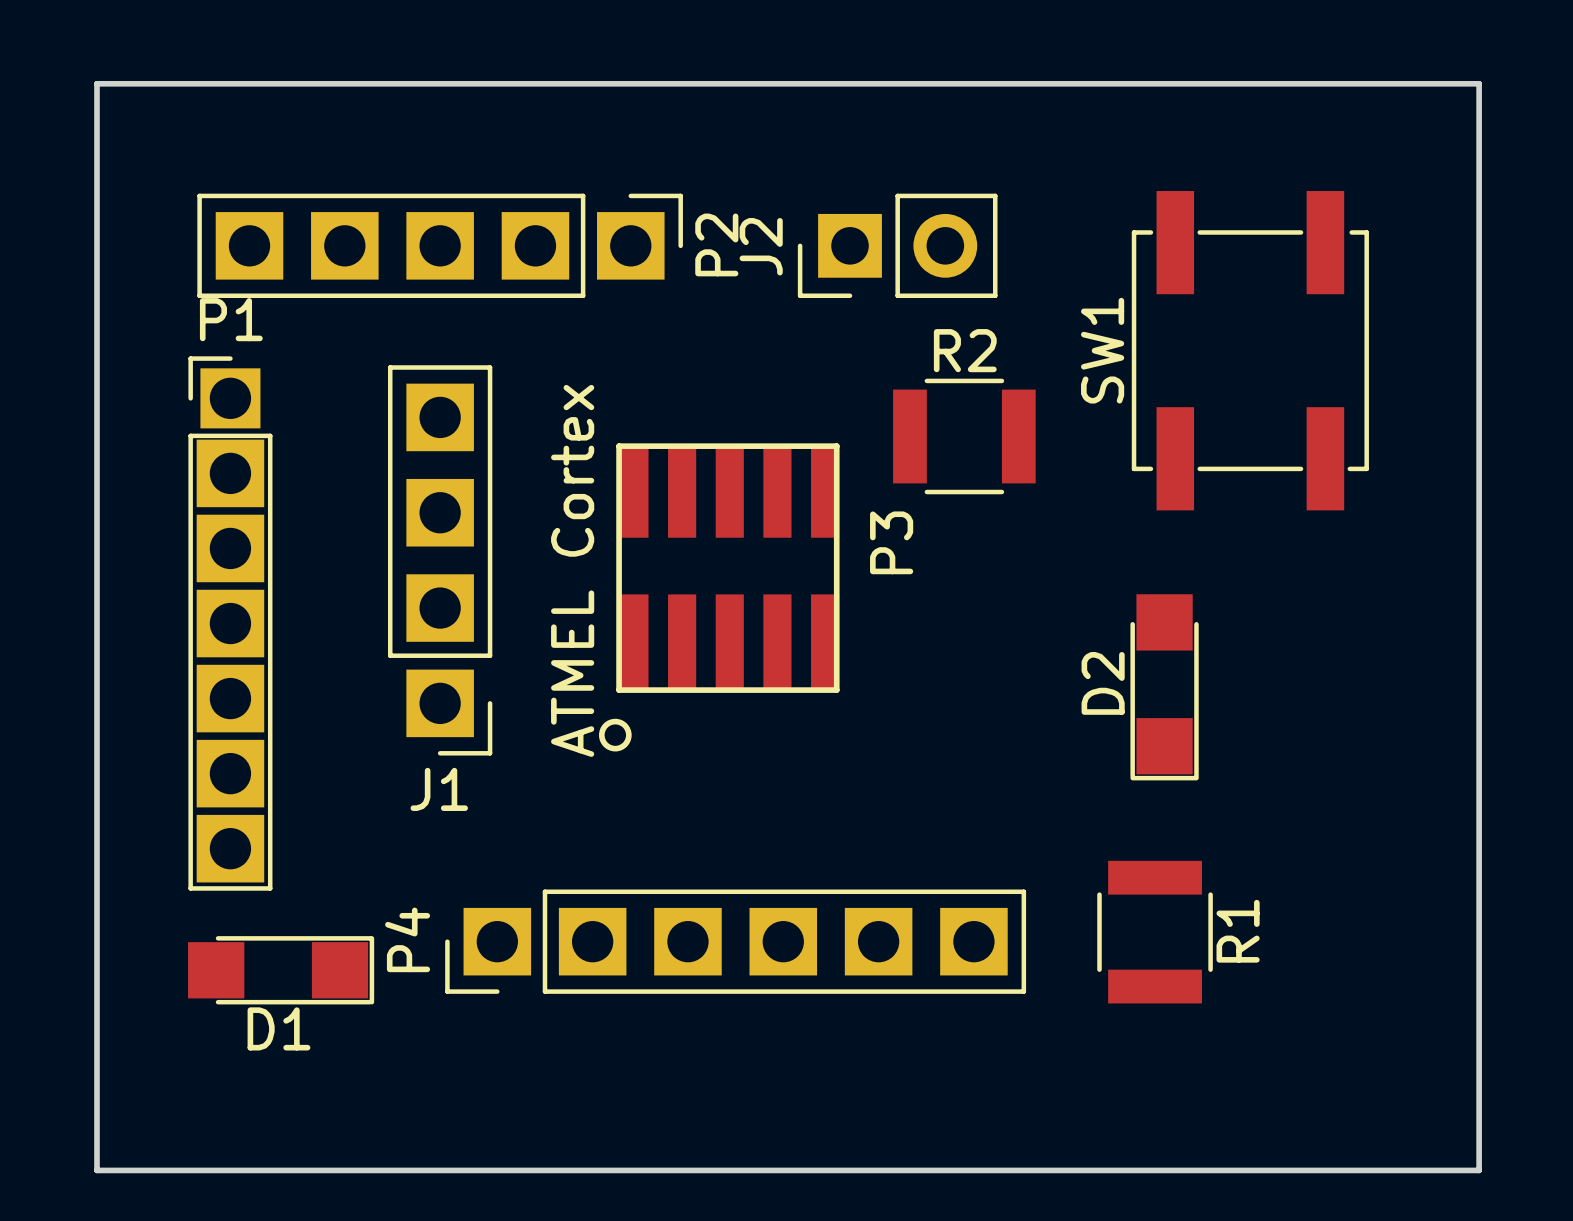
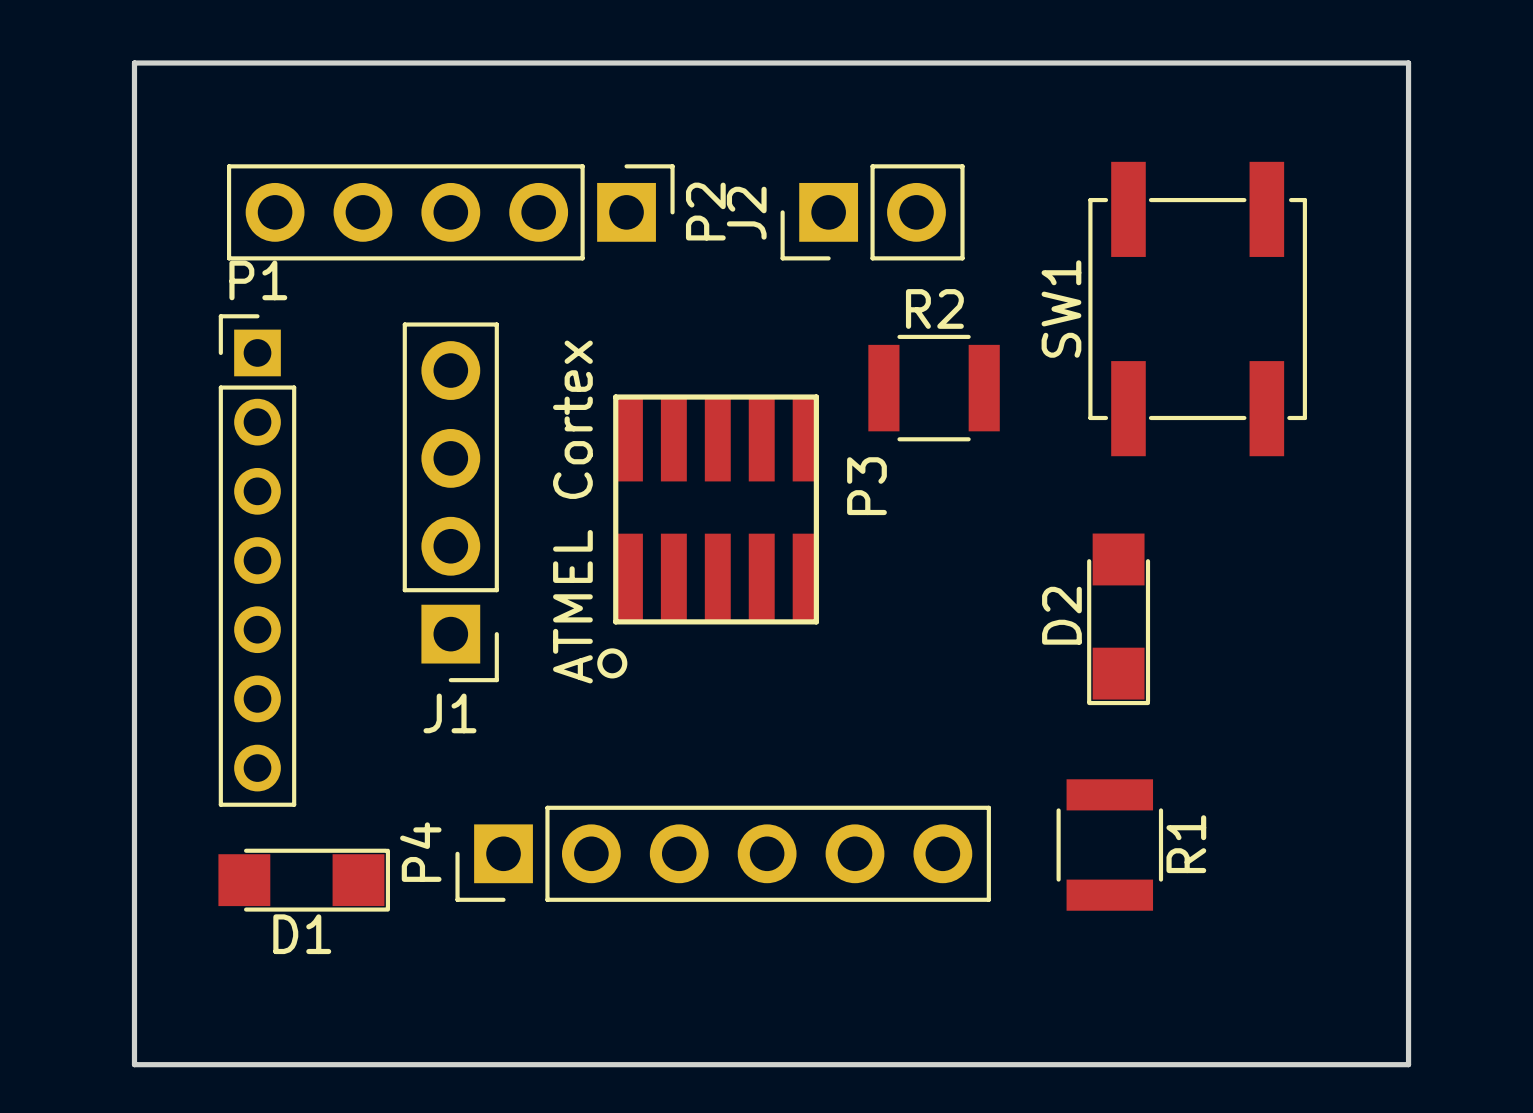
P2 footprint: [197, 193, 683, 299] -> [226, 164, 675, 261]
P1 footprint: [188, 356, 273, 891] -> [218, 314, 297, 807]
J1 footprint: [387, 365, 493, 756] -> [402, 322, 499, 683]
P4 footprint: [445, 889, 1027, 994] -> [455, 805, 991, 902]

